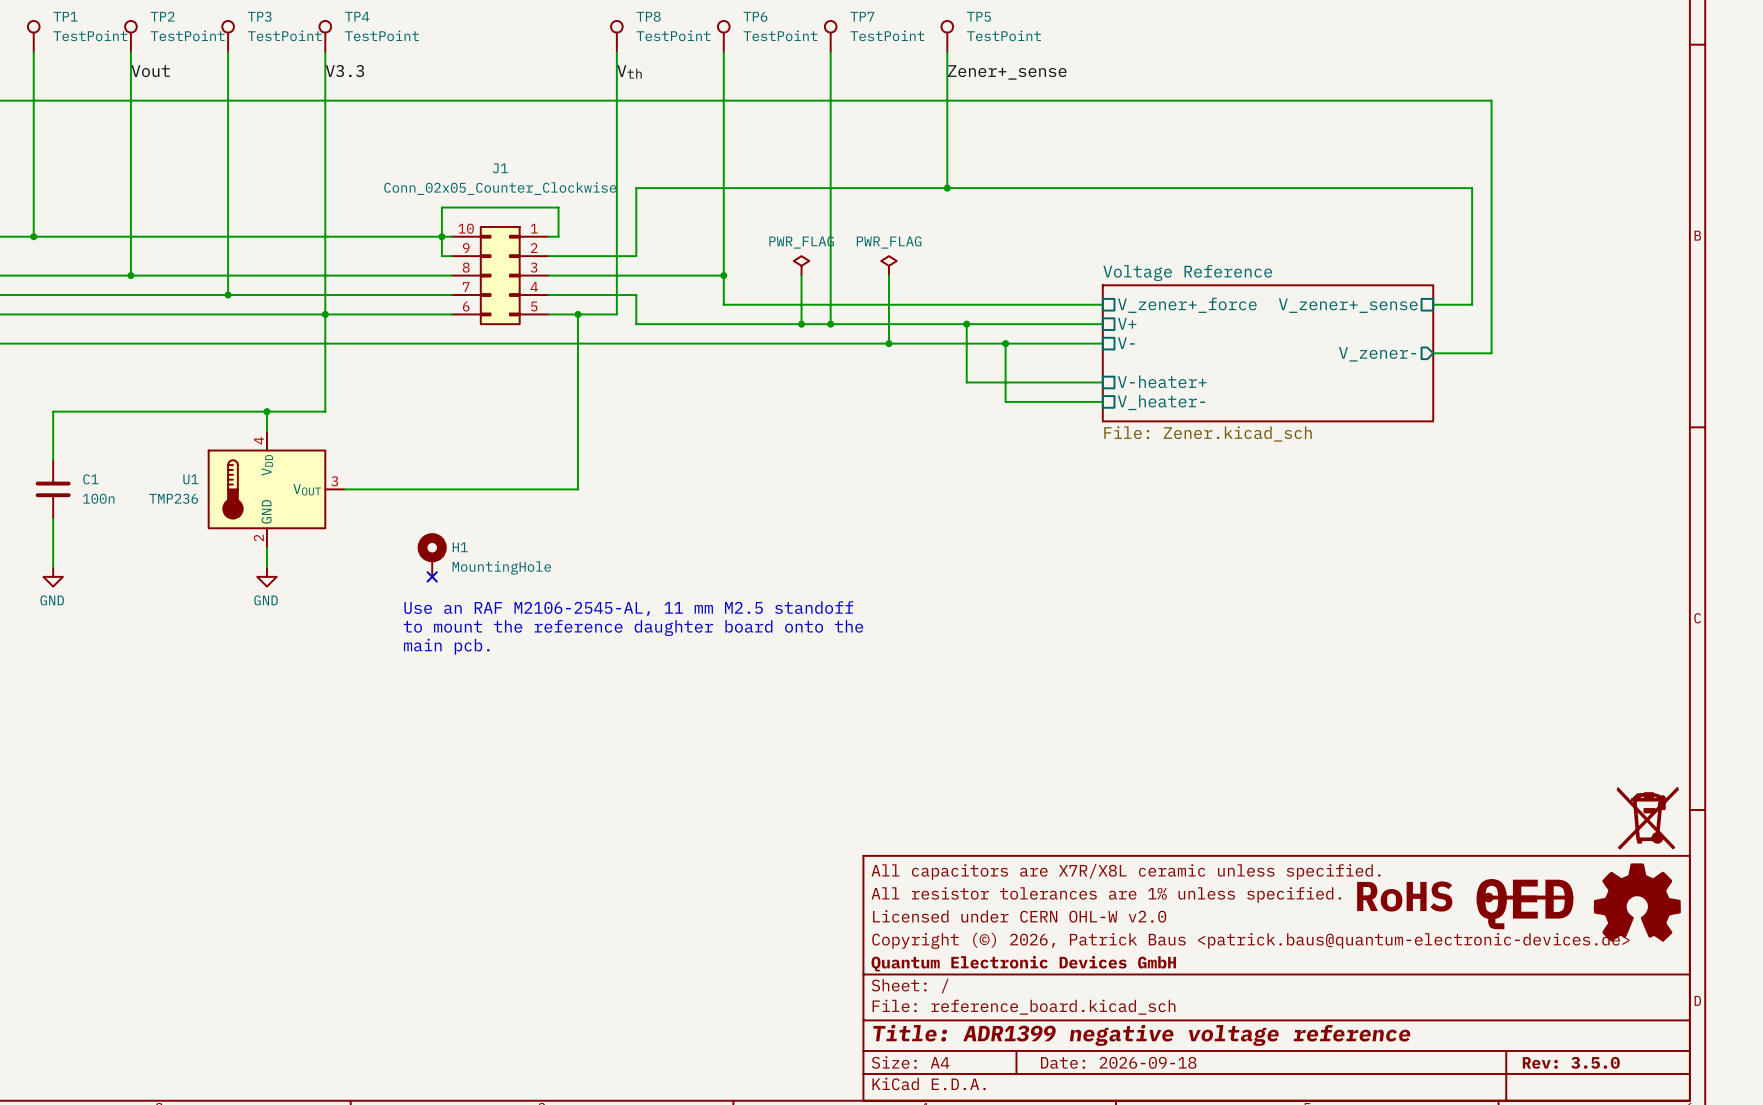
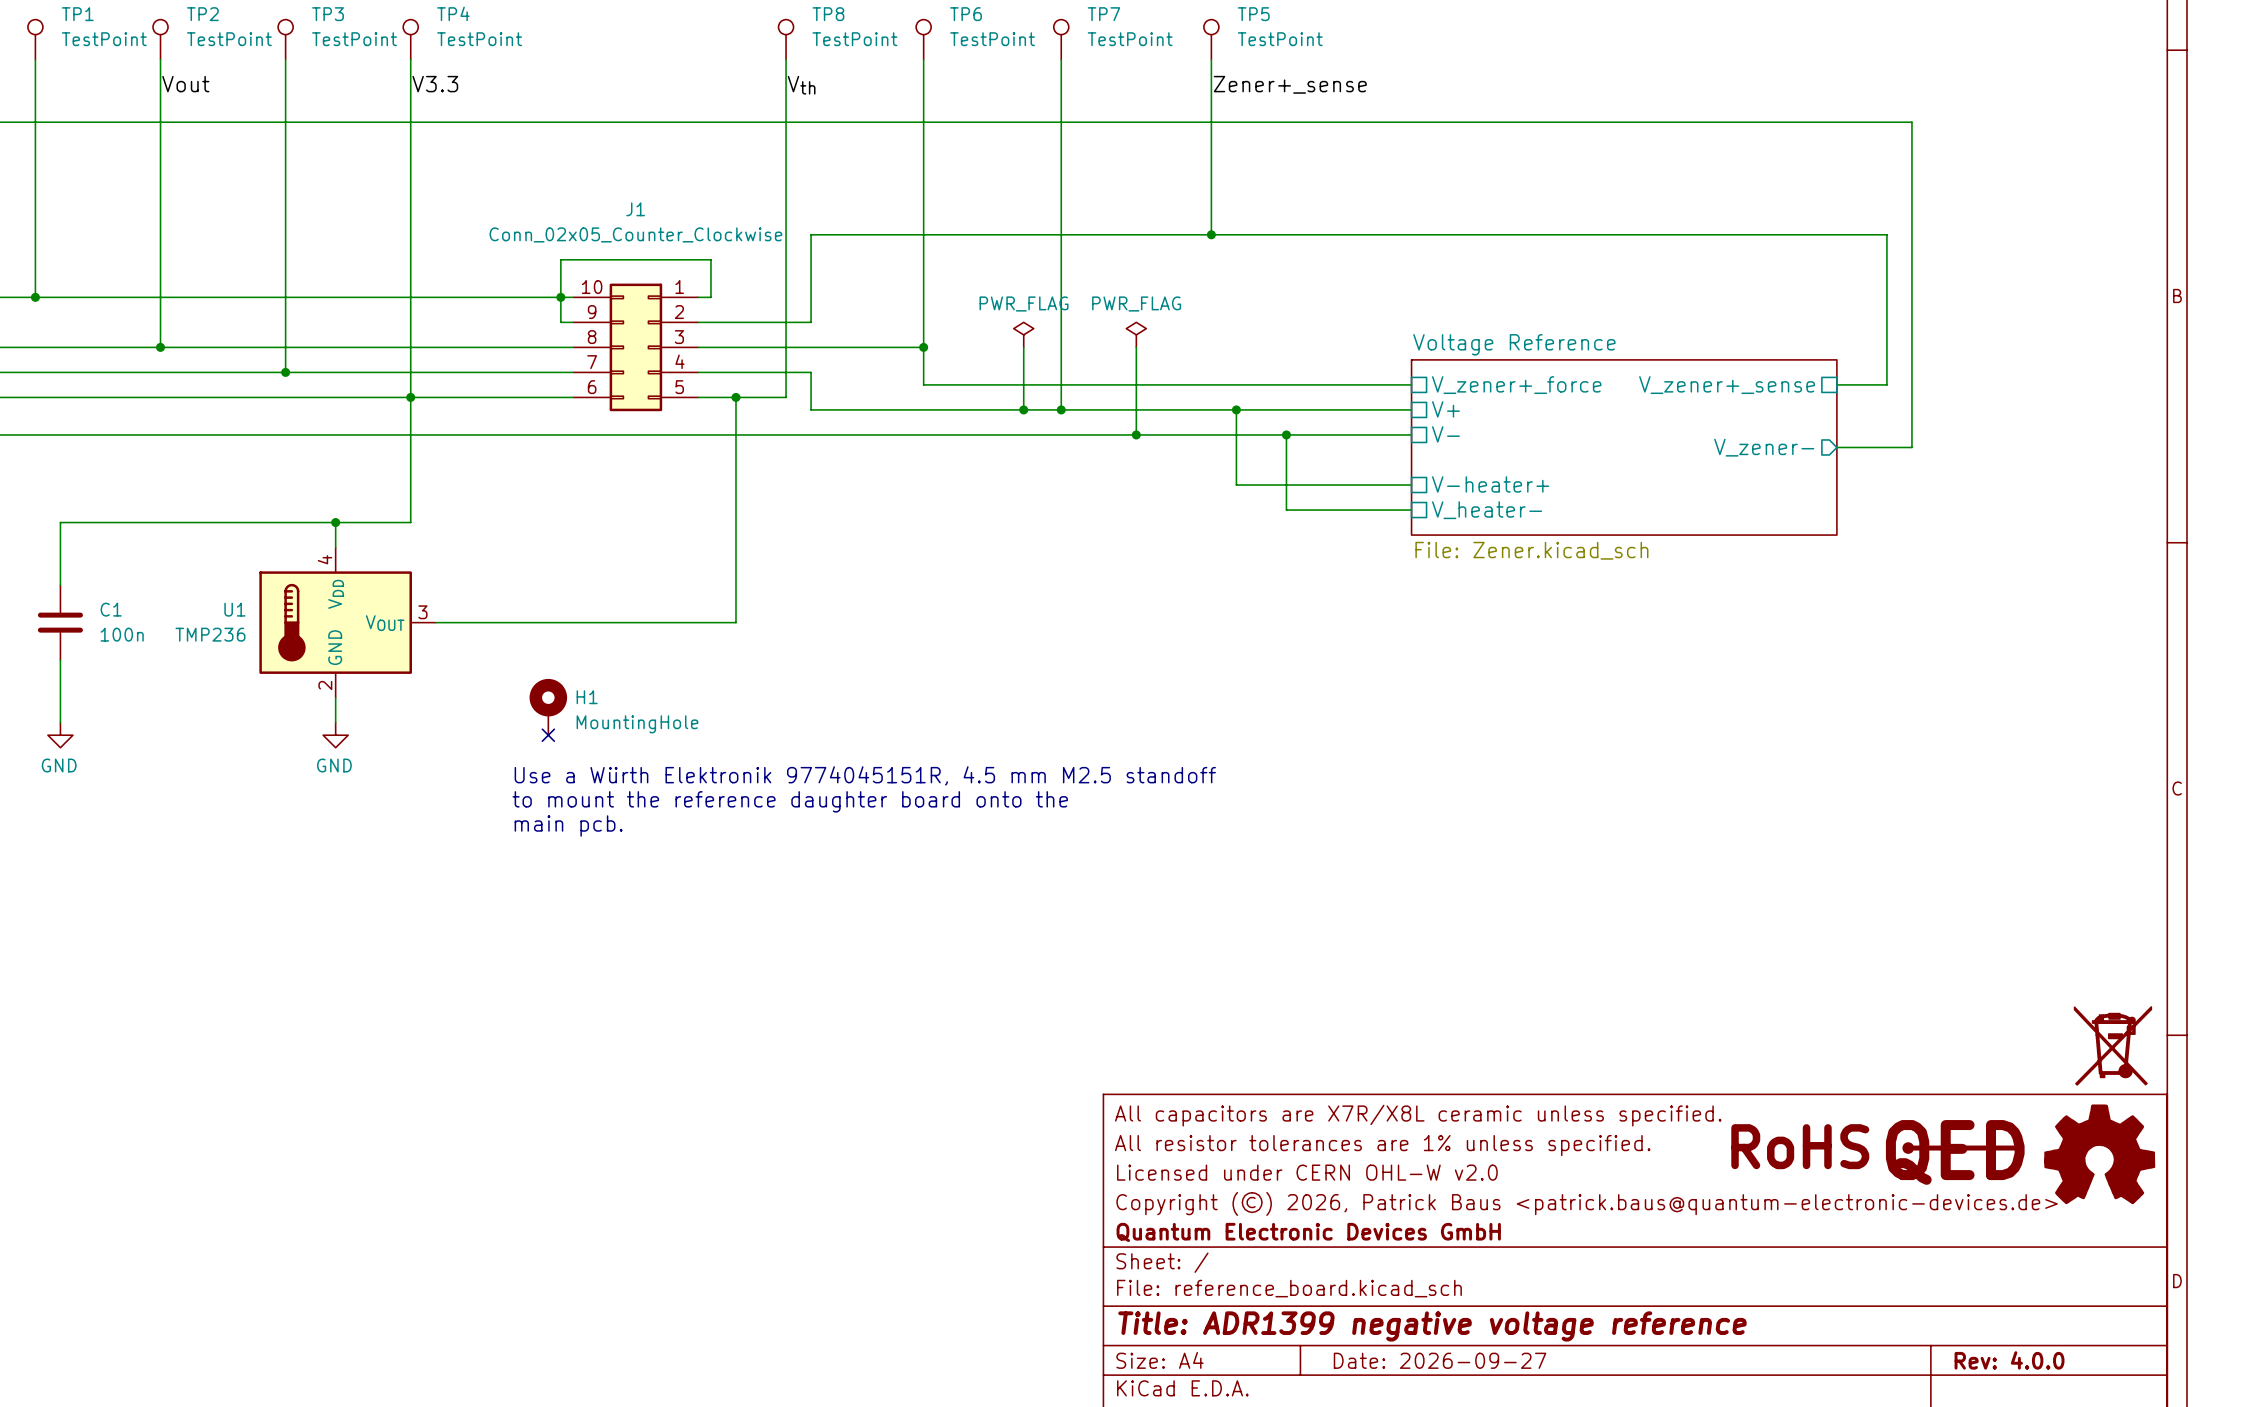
text: Use an RAF M2106-2545-AL, 11 mm M2.5 standoff (628, 608) -> Use a Würth Elektronik 9774045151R, 4.5 mm M2.5 standoff (865, 775)
title block: Date: 2026-09-18 (1118, 1062) -> Date: 2026-09-27 (1440, 1360)
title block: Rev: 3.5.0 (1571, 1062) -> Rev: 4.0.0 (2009, 1360)

